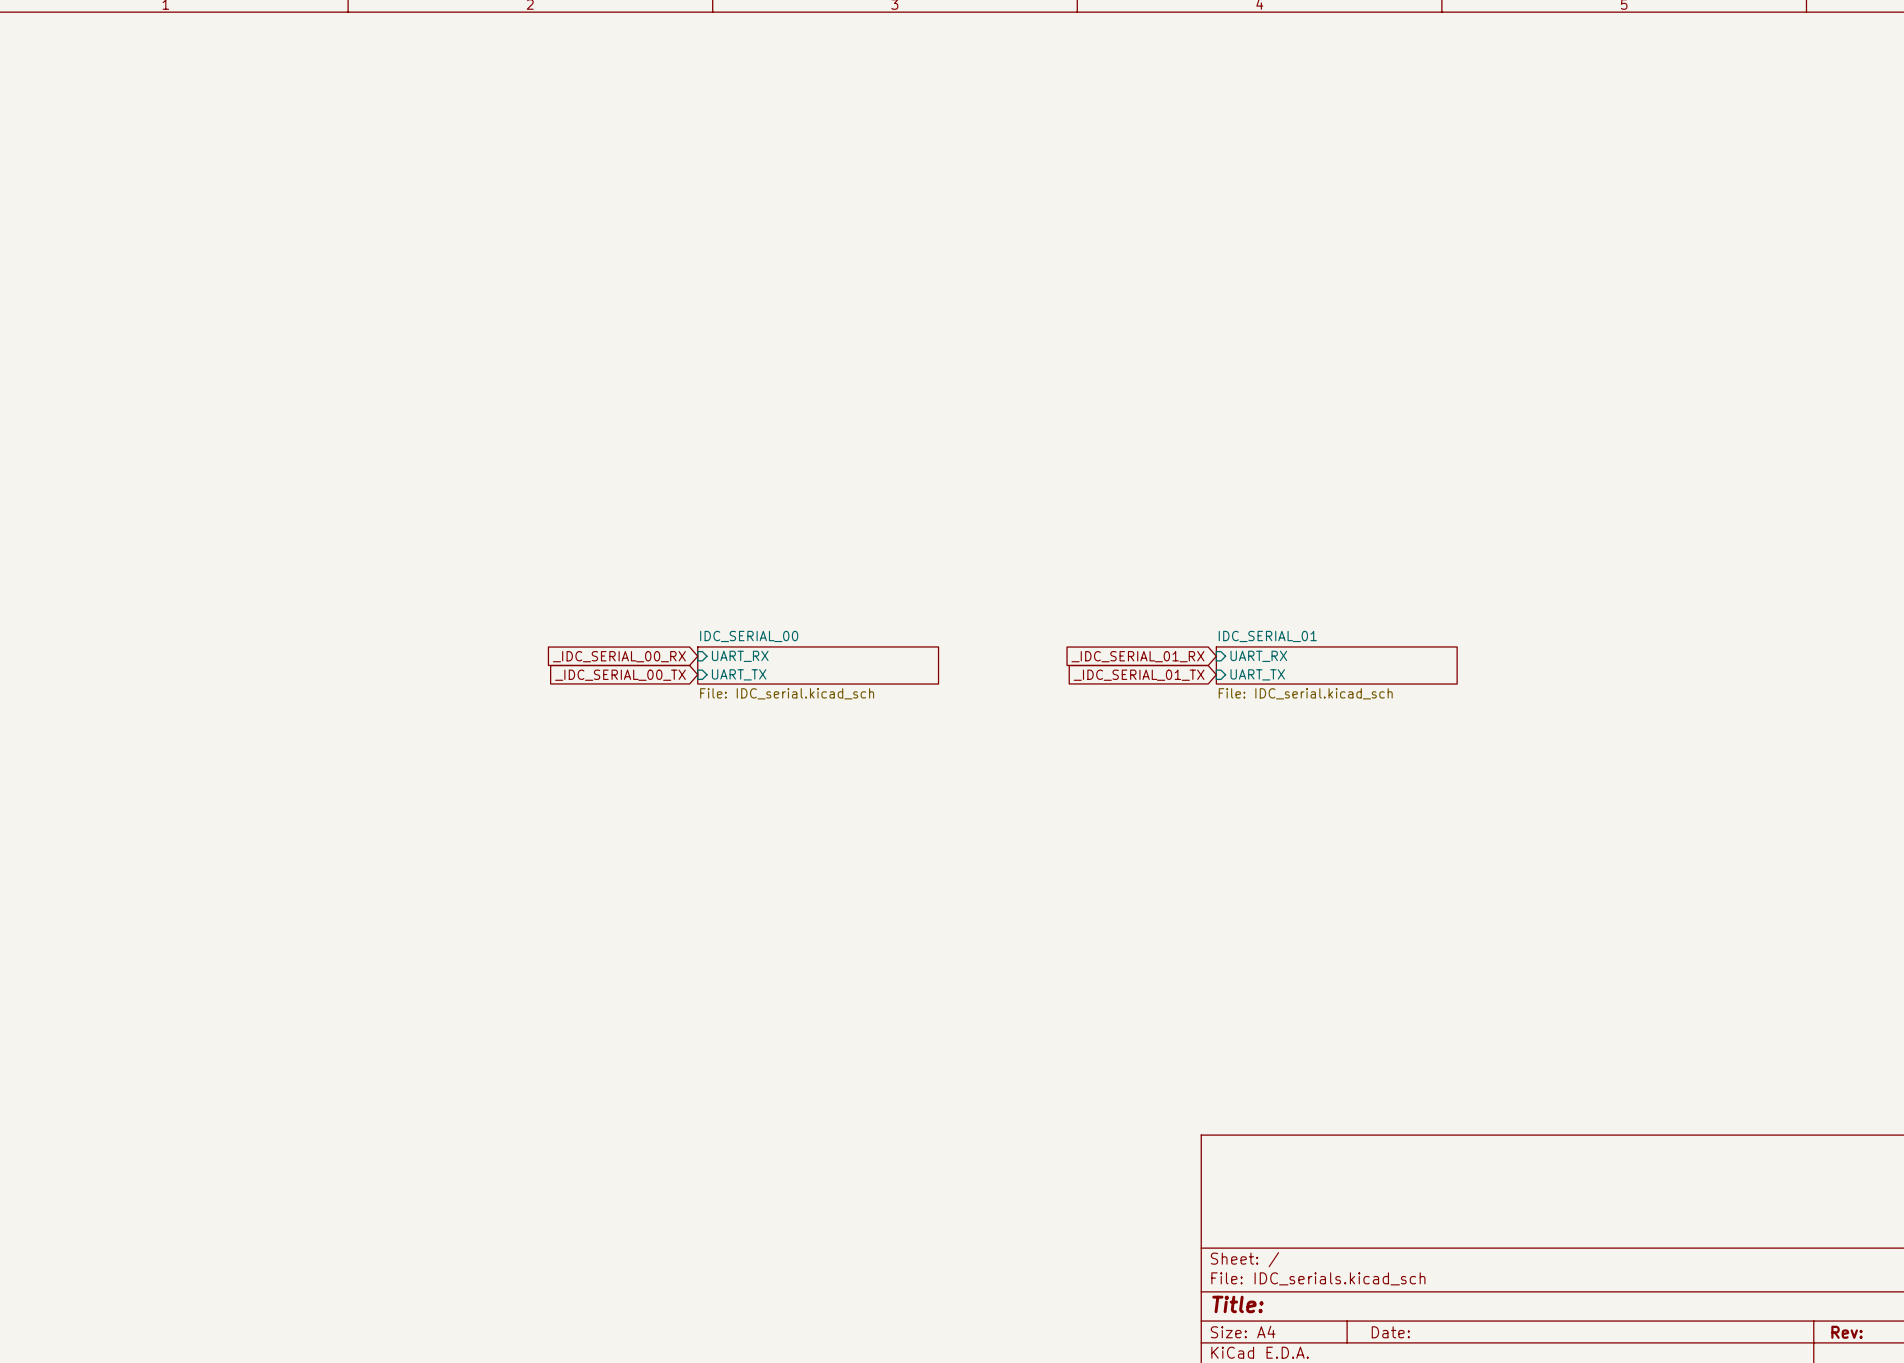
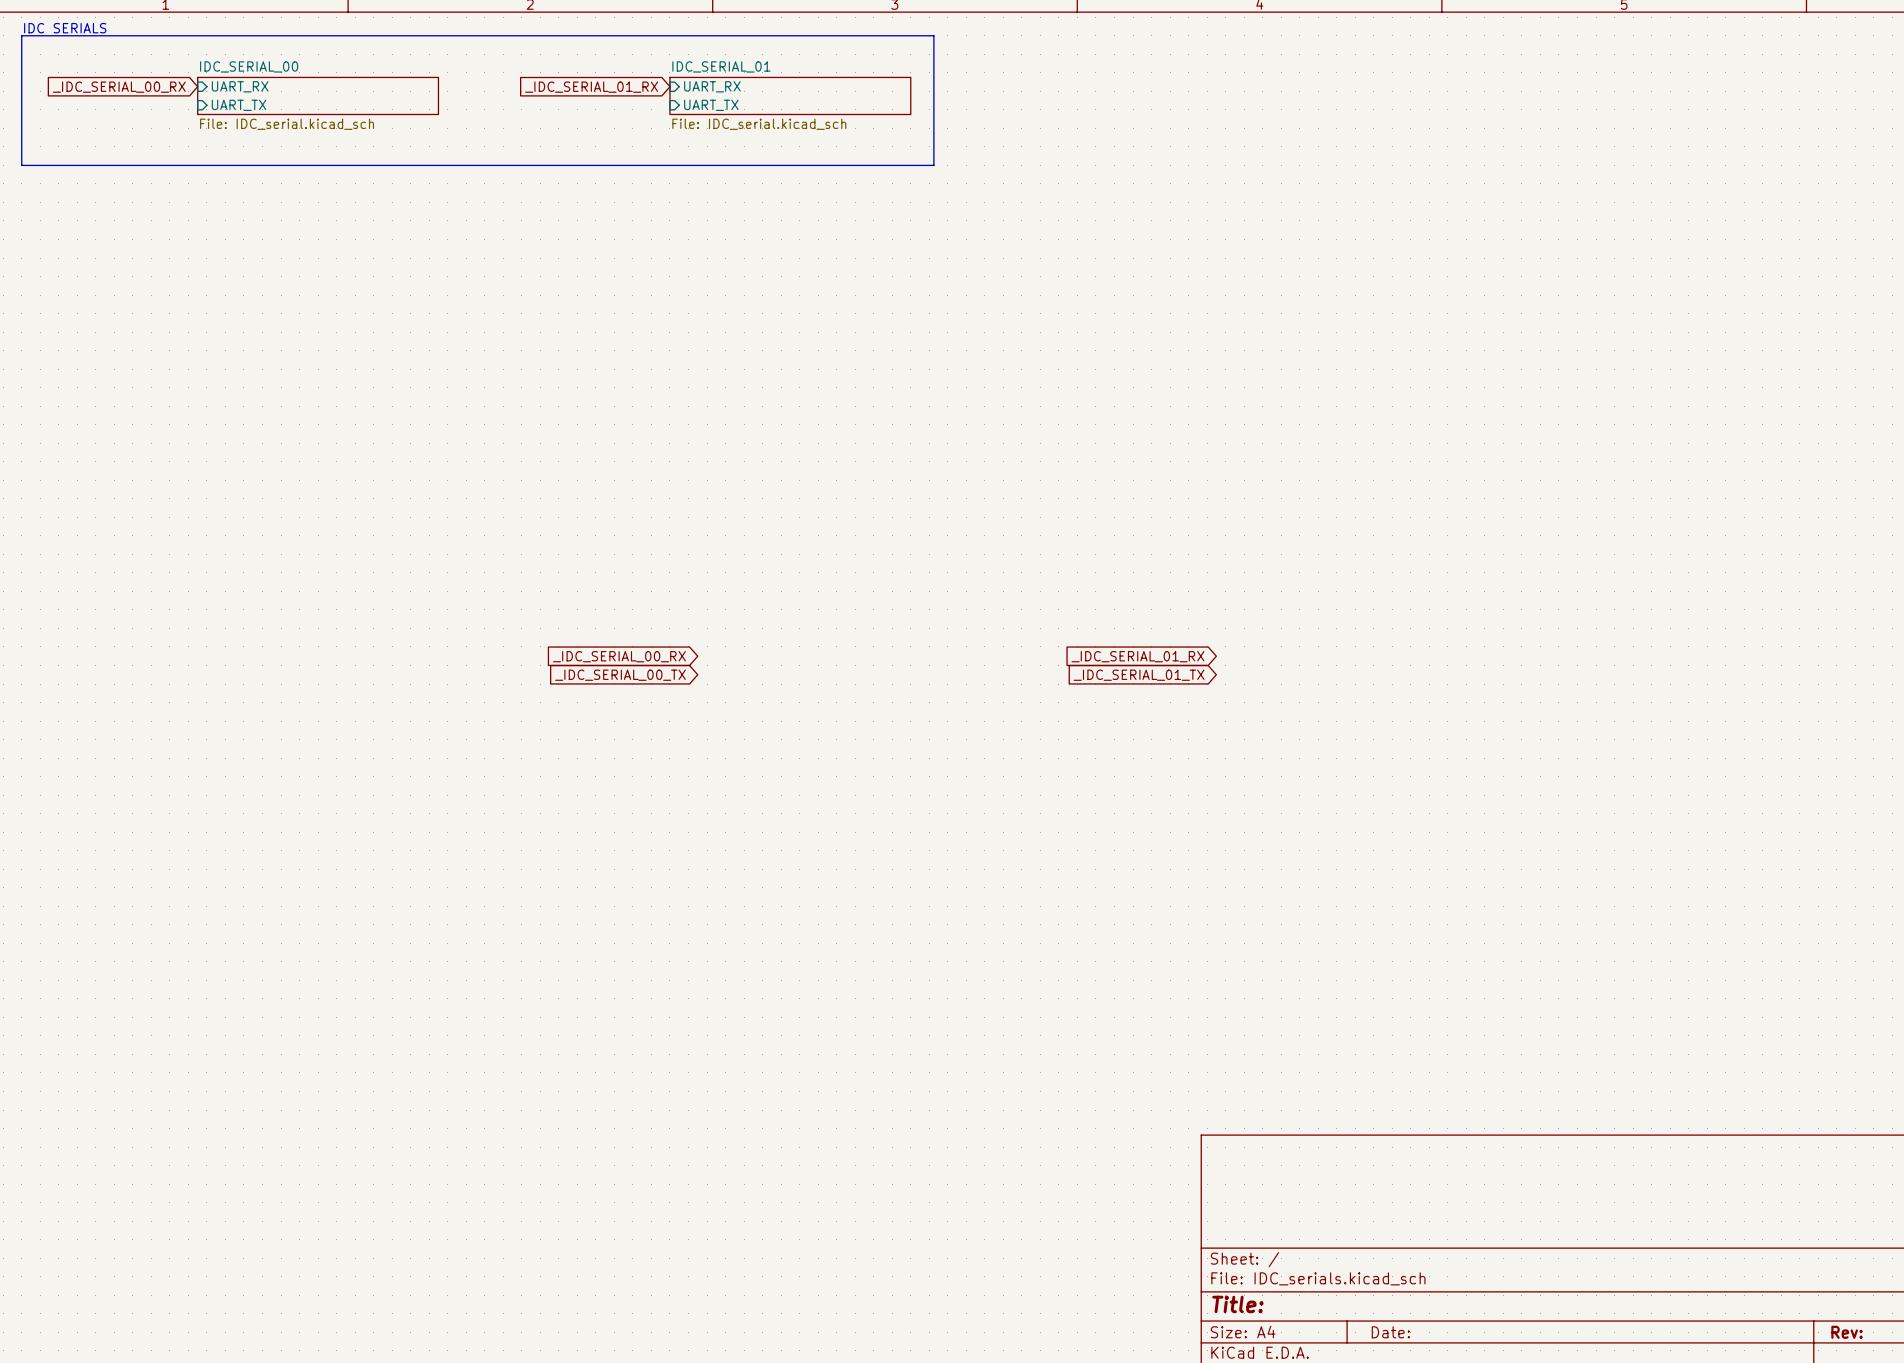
text: none -> IDC SERIALS (65, 28)
line: none -> (21, 35) (933, 35) (933, 165) (21, 165) (21, 35)
sheet pin: none -> UART_RX (240, 86)
sheet pin: none -> UART_RX (712, 86)
global label: none -> _IDC_SERIAL_00_RX (119, 87)
global label: none -> _IDC_SERIAL_01_RX (591, 87)
sheet pin: none -> UART_TX (239, 105)
sheet pin: none -> UART_TX (711, 105)
sheet pin: UART_RX (740, 656) -> none
sheet pin: UART_RX (1258, 656) -> none
sheet IDC_SERIAL_00 position: (818, 665) -> (318, 95)
sheet IDC_SERIAL_01 position: (1336, 665) -> (790, 95)
sheet pin: UART_TX (739, 674) -> none
sheet pin: UART_TX (1257, 674) -> none

